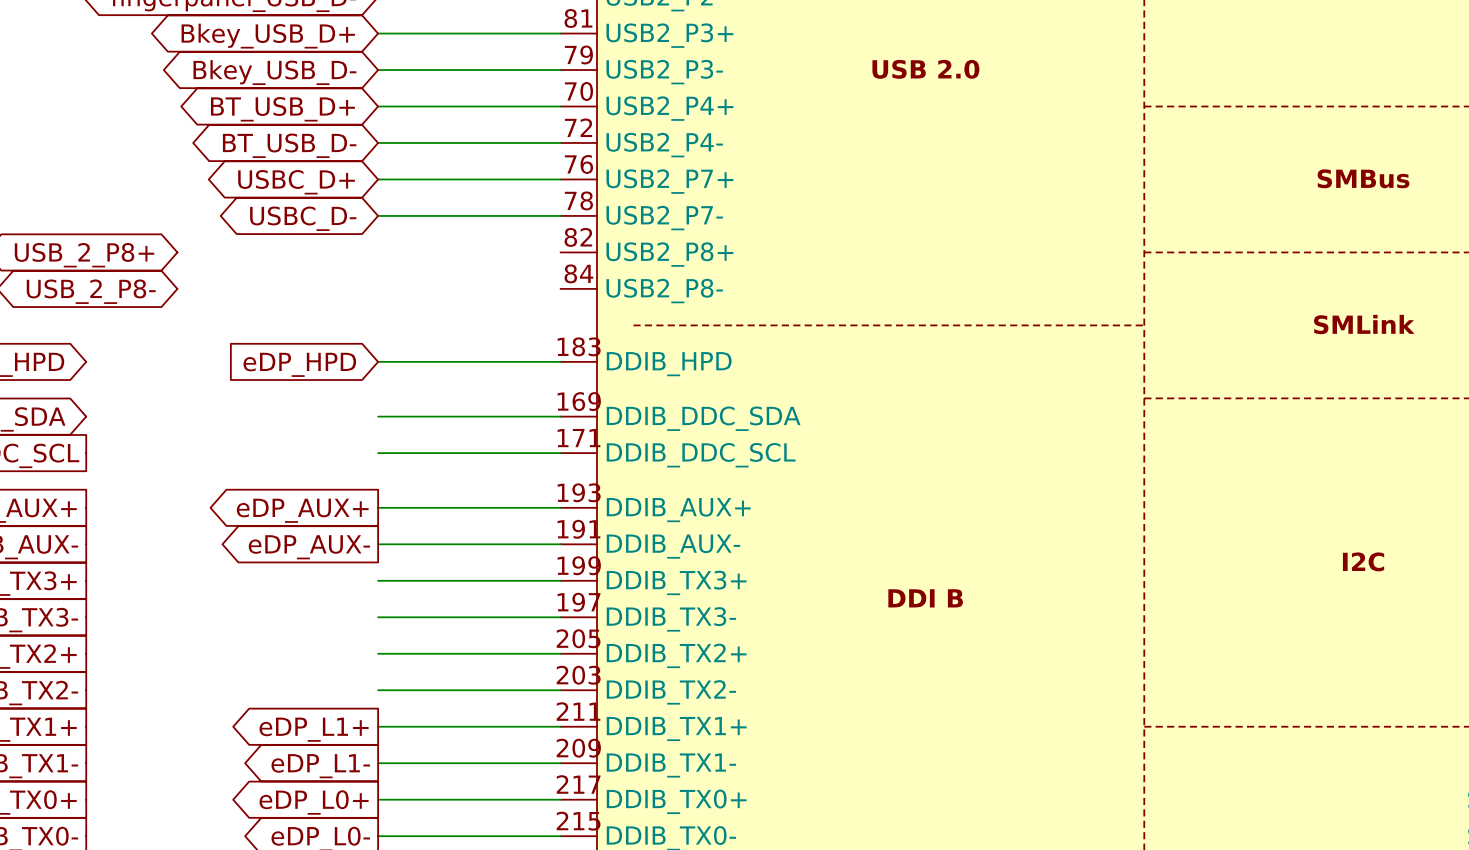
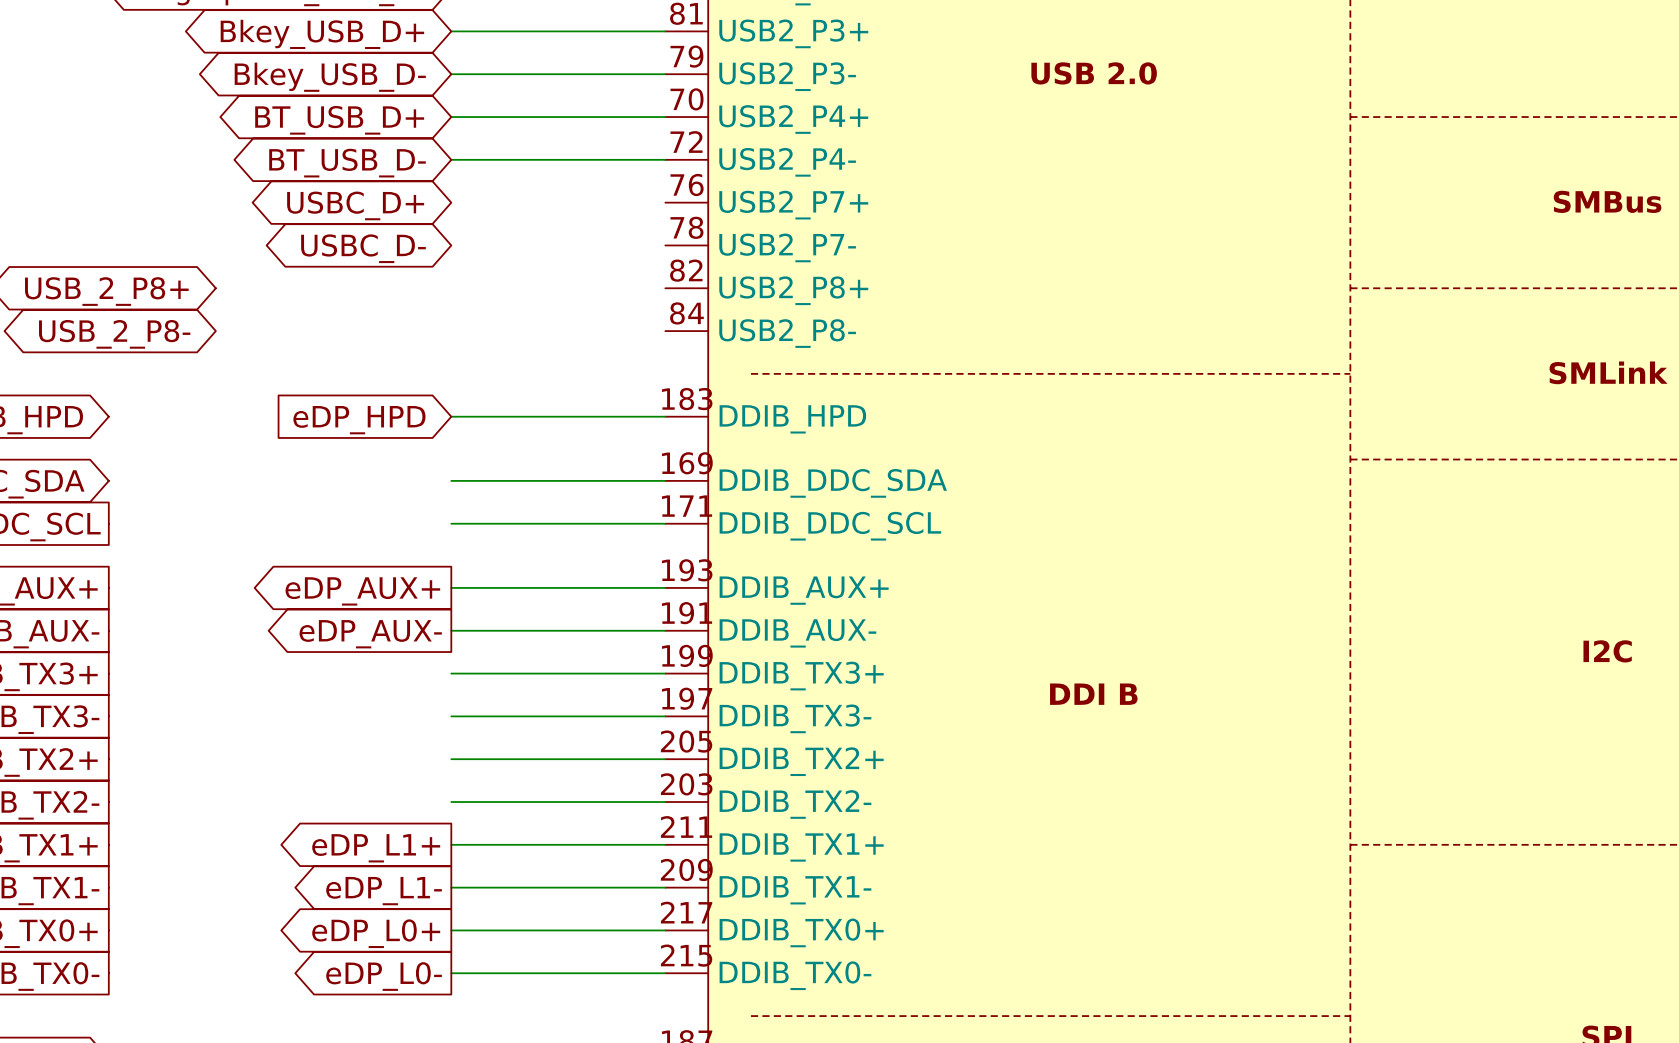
wire: (378, 179) (560, 179) -> none
wire: (378, 215) (560, 215) -> none

